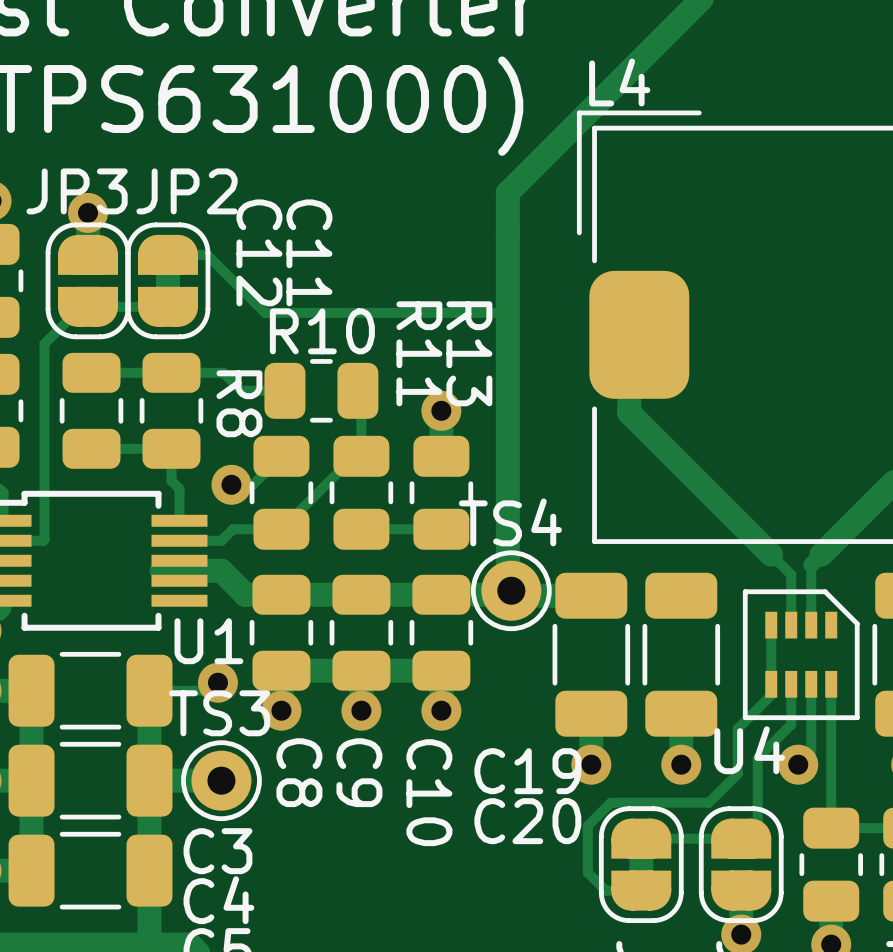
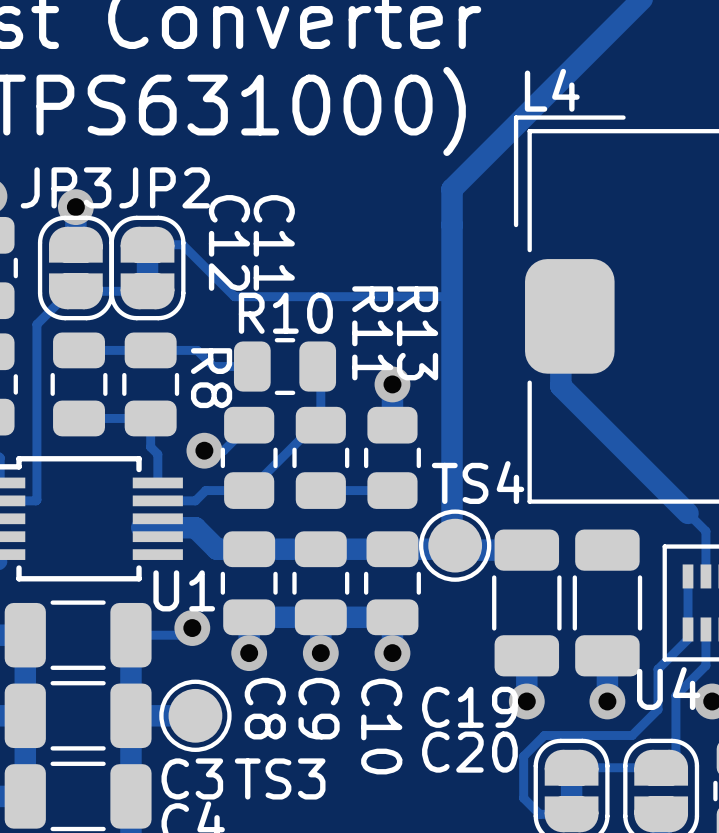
TS4 footprint: [470, 550, 552, 632] -> [418, 509, 492, 582]
TS3 name position: TS3 (219, 713) -> TS3 (280, 778)
TS3 footprint: [181, 740, 262, 822] -> [159, 679, 232, 752]

